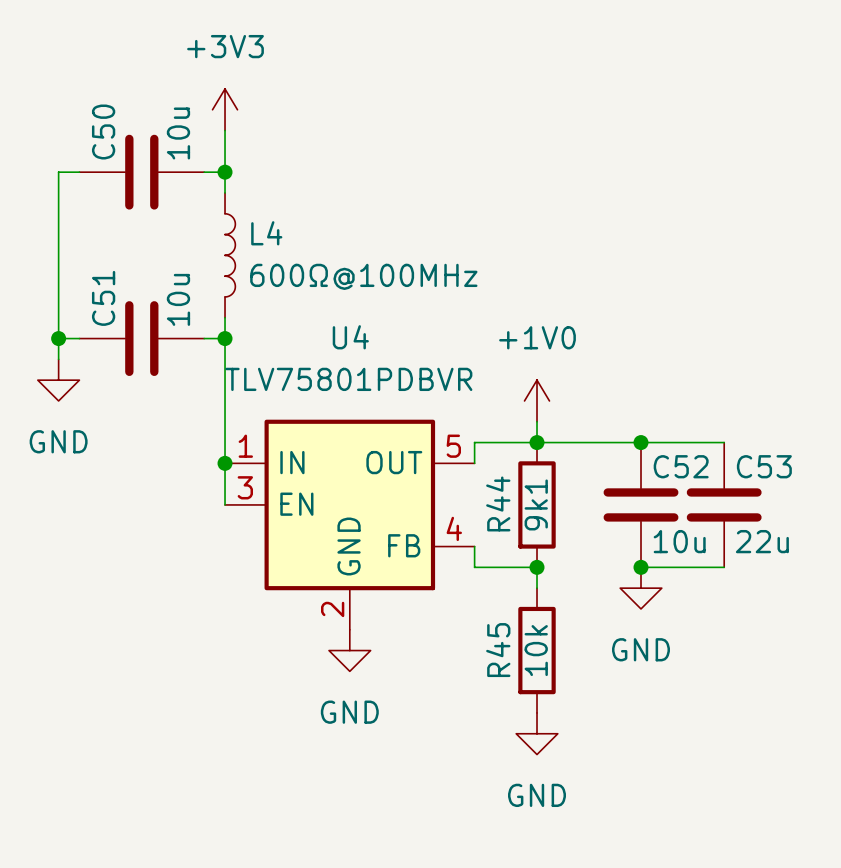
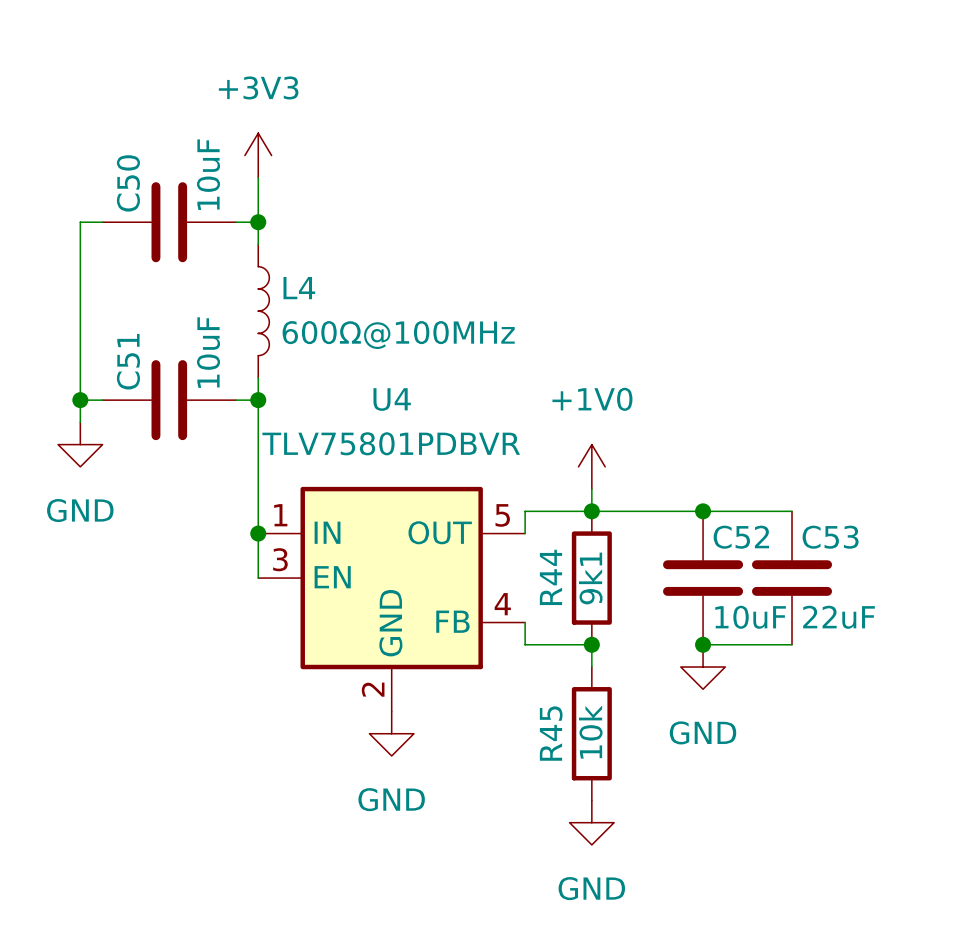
C50 value: 10u (178, 133) -> 10uF (208, 174)
C51 value: 10u (178, 299) -> 10uF (208, 352)
C52 value: 10u (679, 541) -> 10uF (750, 617)
C53 value: 22u (762, 541) -> 22uF (838, 617)

